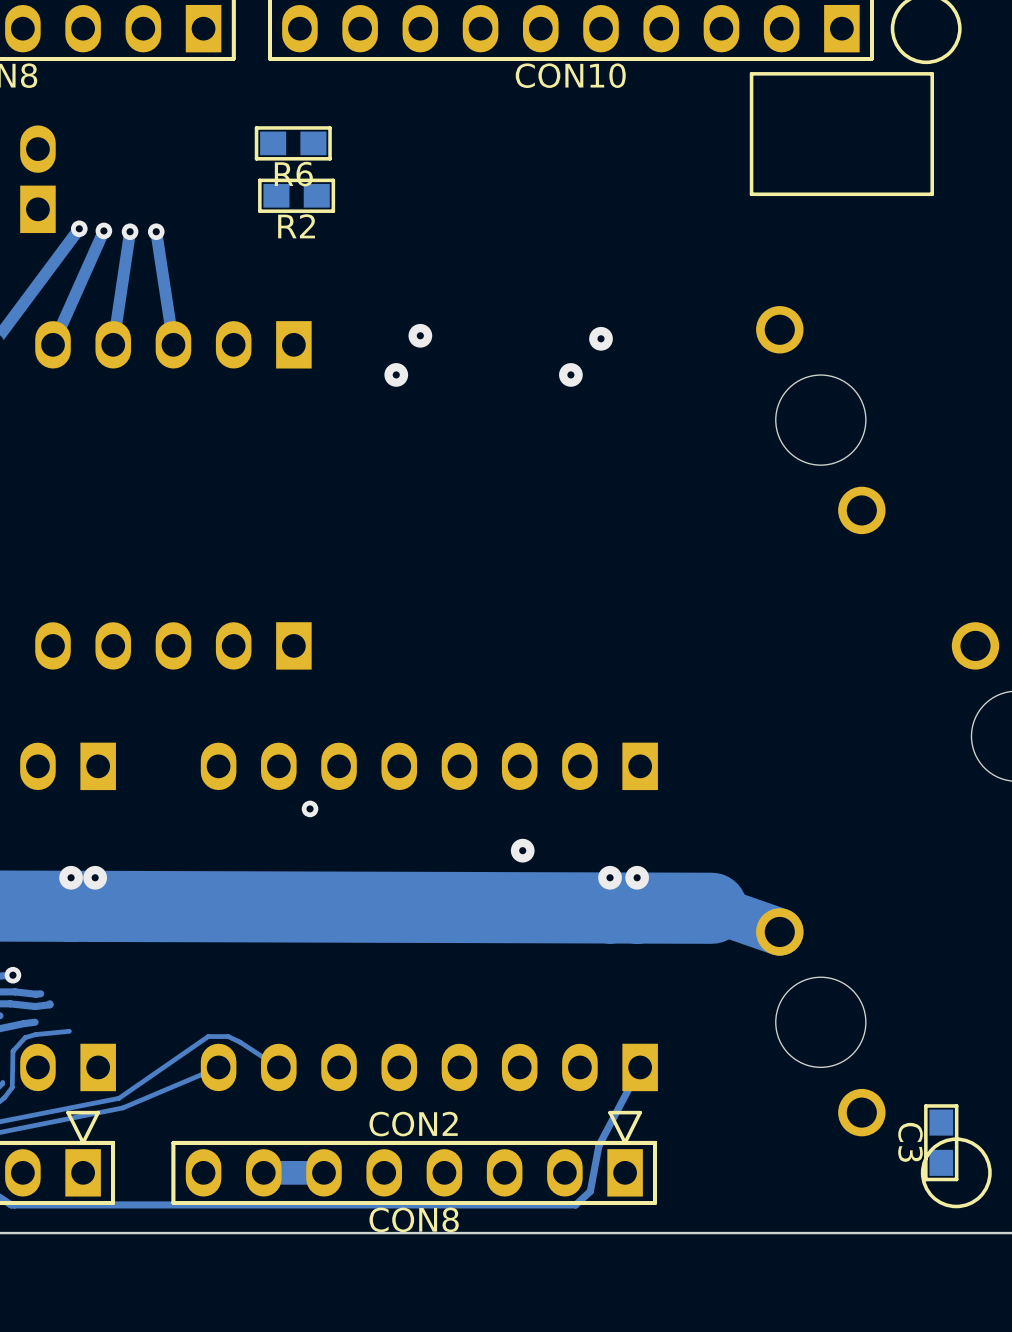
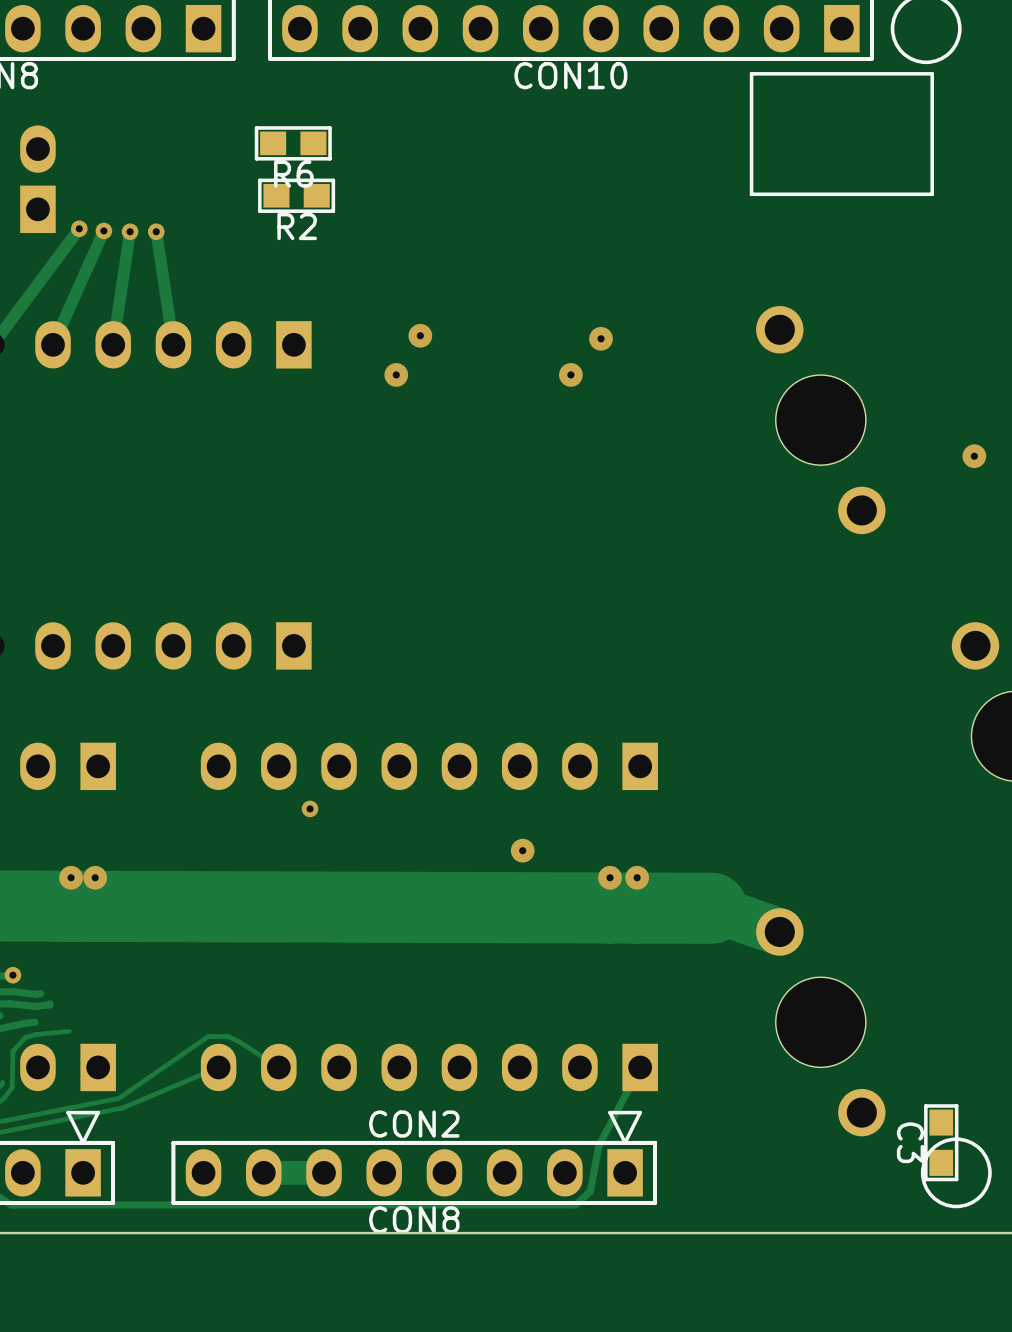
via: none -> (974, 456)

